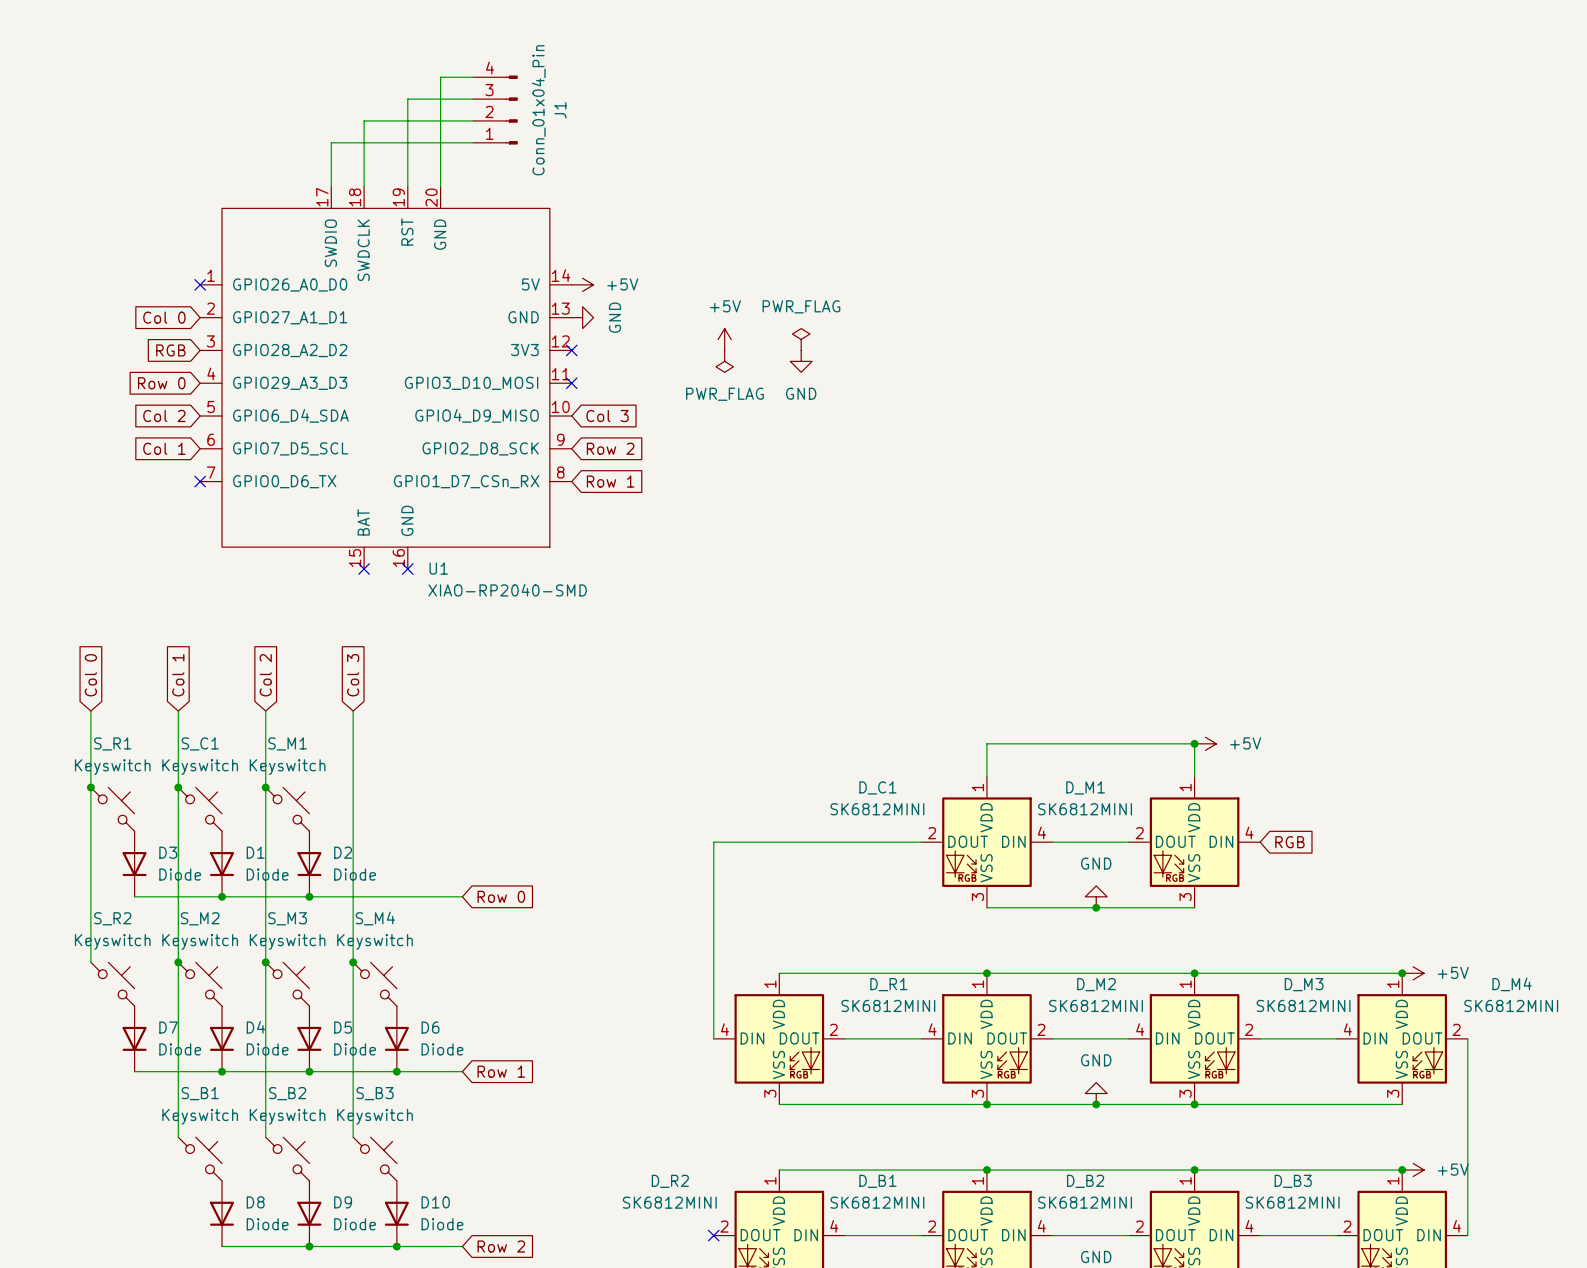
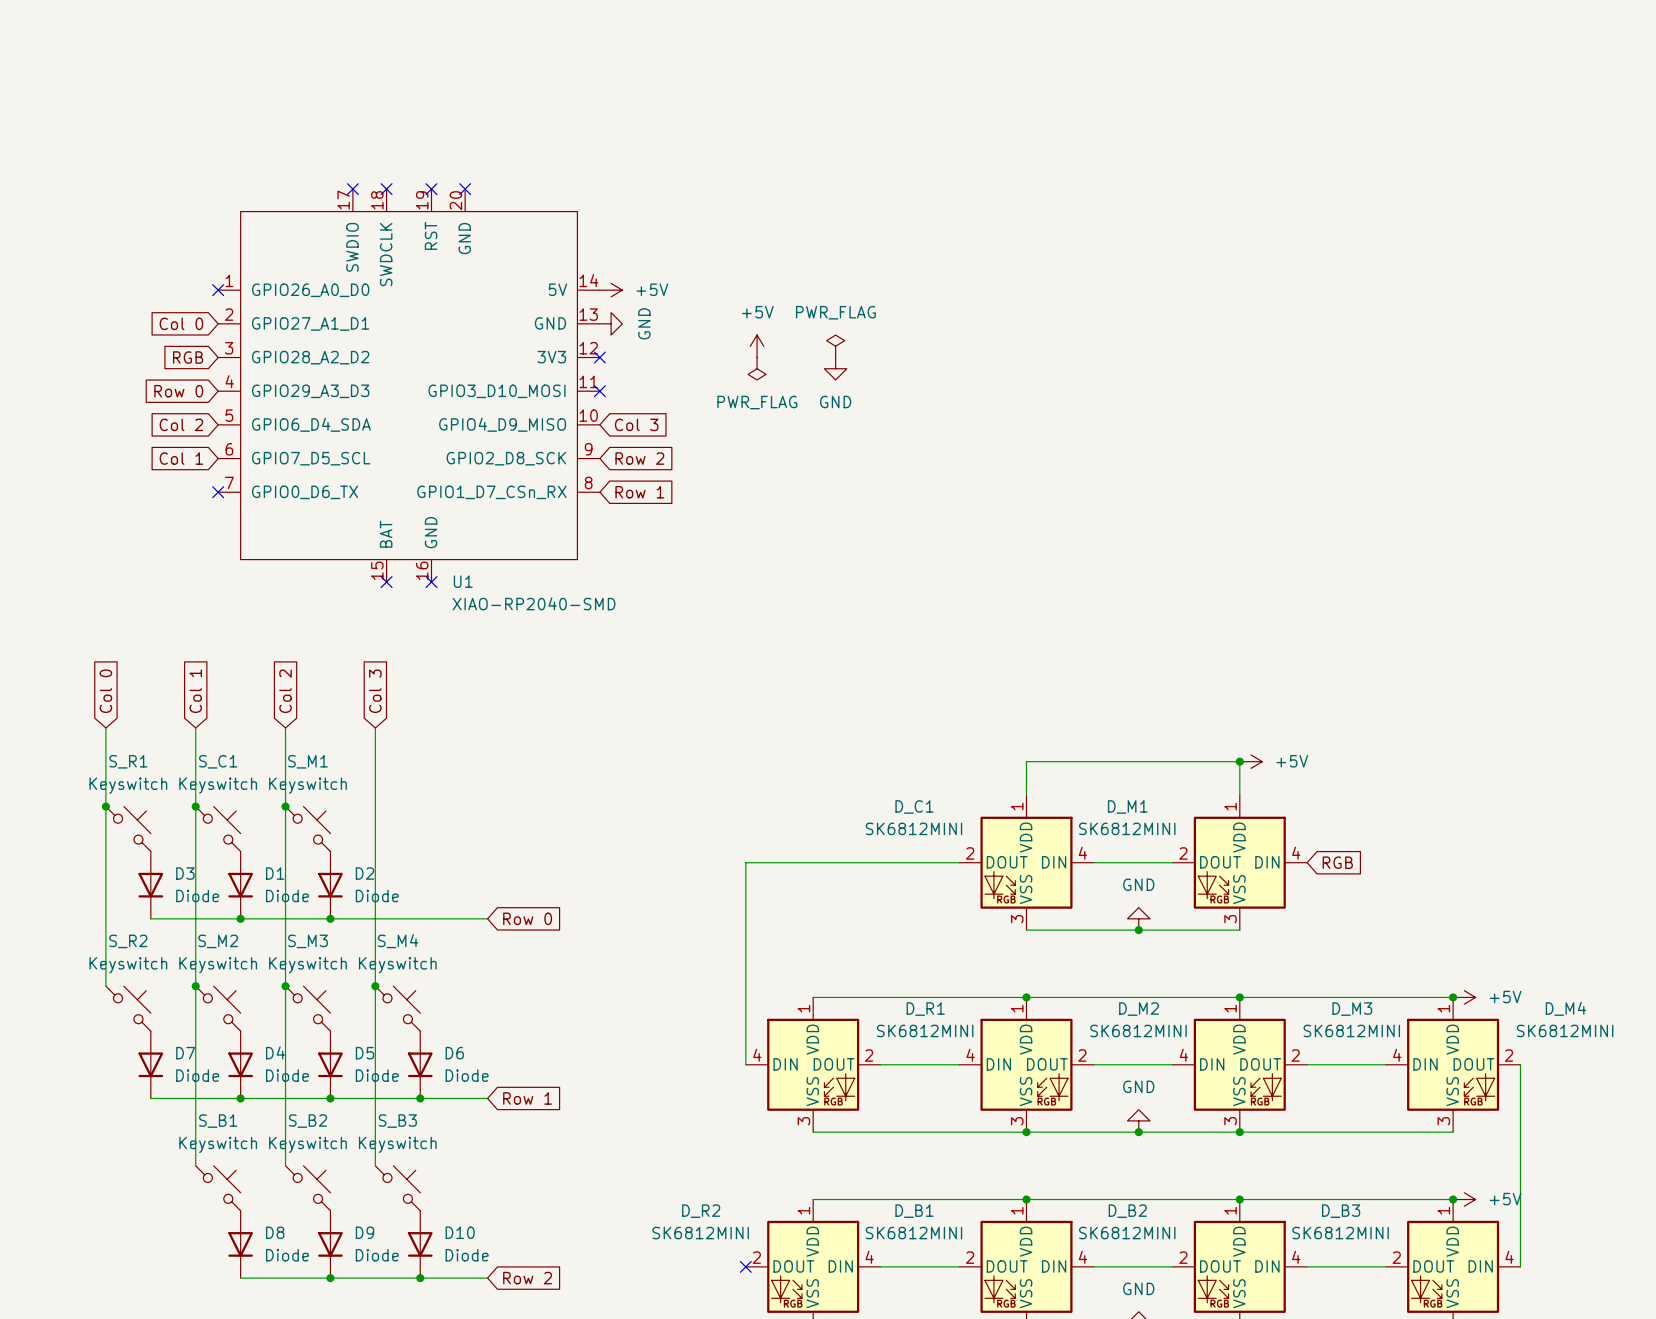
wire: (473, 77) (440, 77) (440, 186) -> none
wire: (473, 99) (407, 99) (407, 186) -> none
J1: Conn_01x04_Pin (495, 110) -> none
wire: (473, 120) (364, 120) (364, 186) -> none
wire: (473, 142) (331, 142) (331, 186) -> none
no-connect mark: none -> (352, 189)
no-connect mark: none -> (386, 189)
no-connect mark: none -> (431, 189)
no-connect mark: none -> (465, 189)

